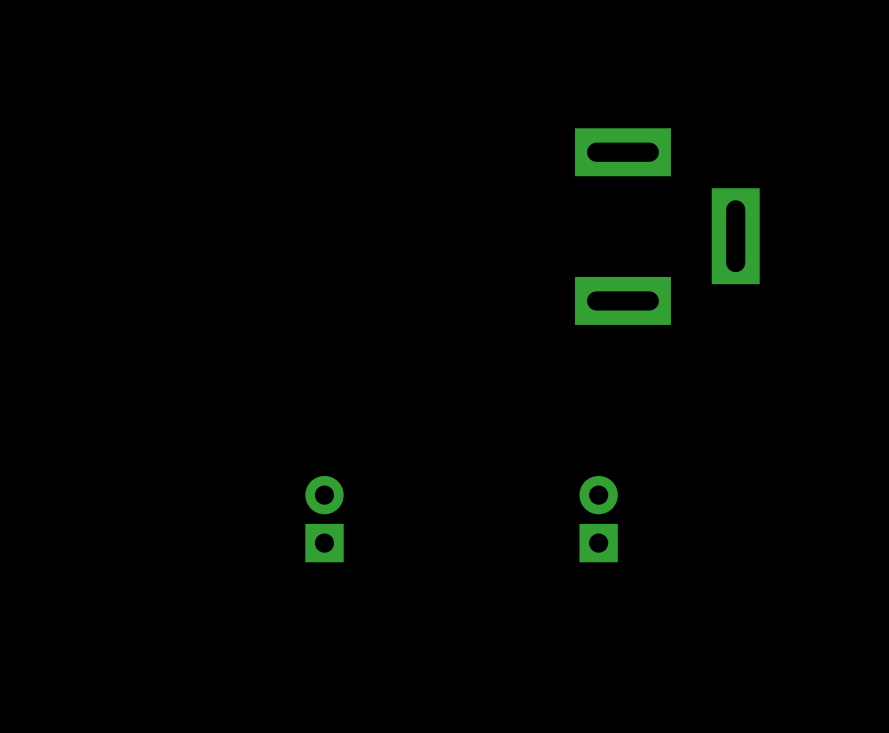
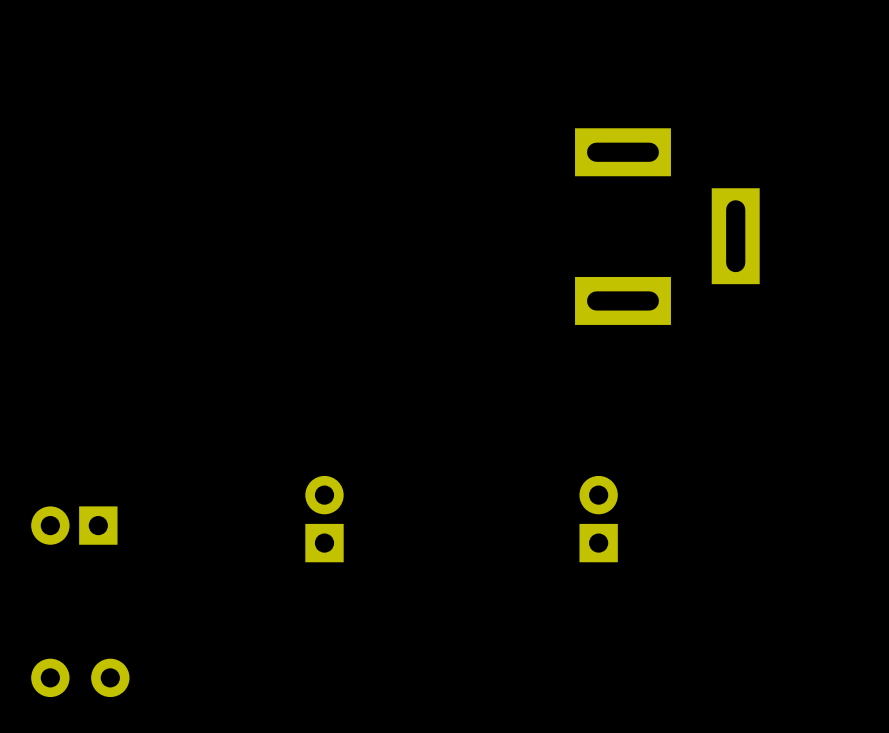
part: none -> (74, 525)
part: none -> (80, 677)

